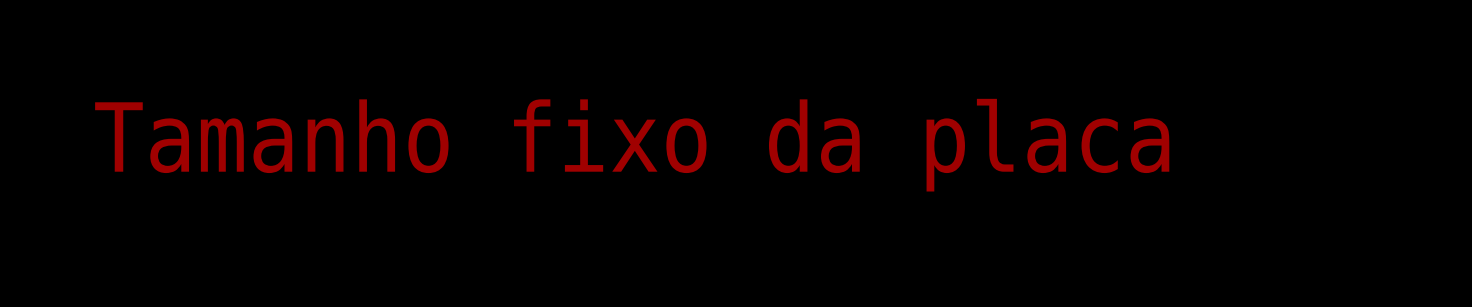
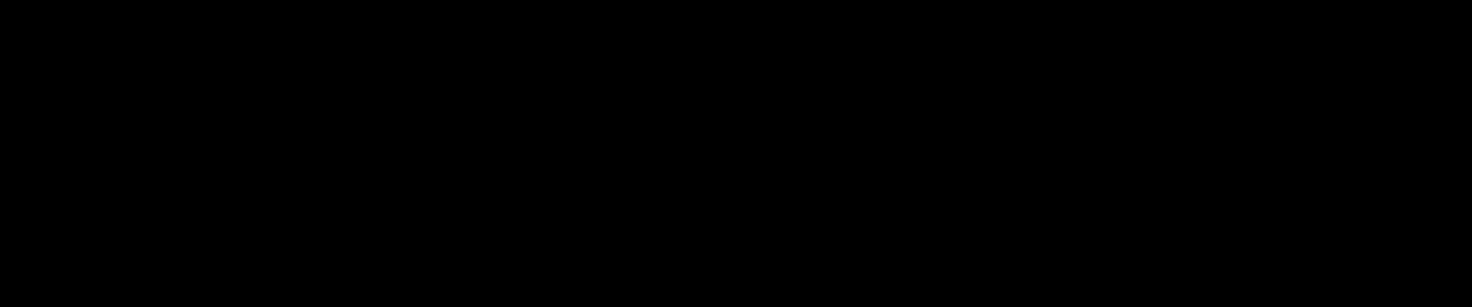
text: Tamanho fixo da placa (632, 145) -> none

